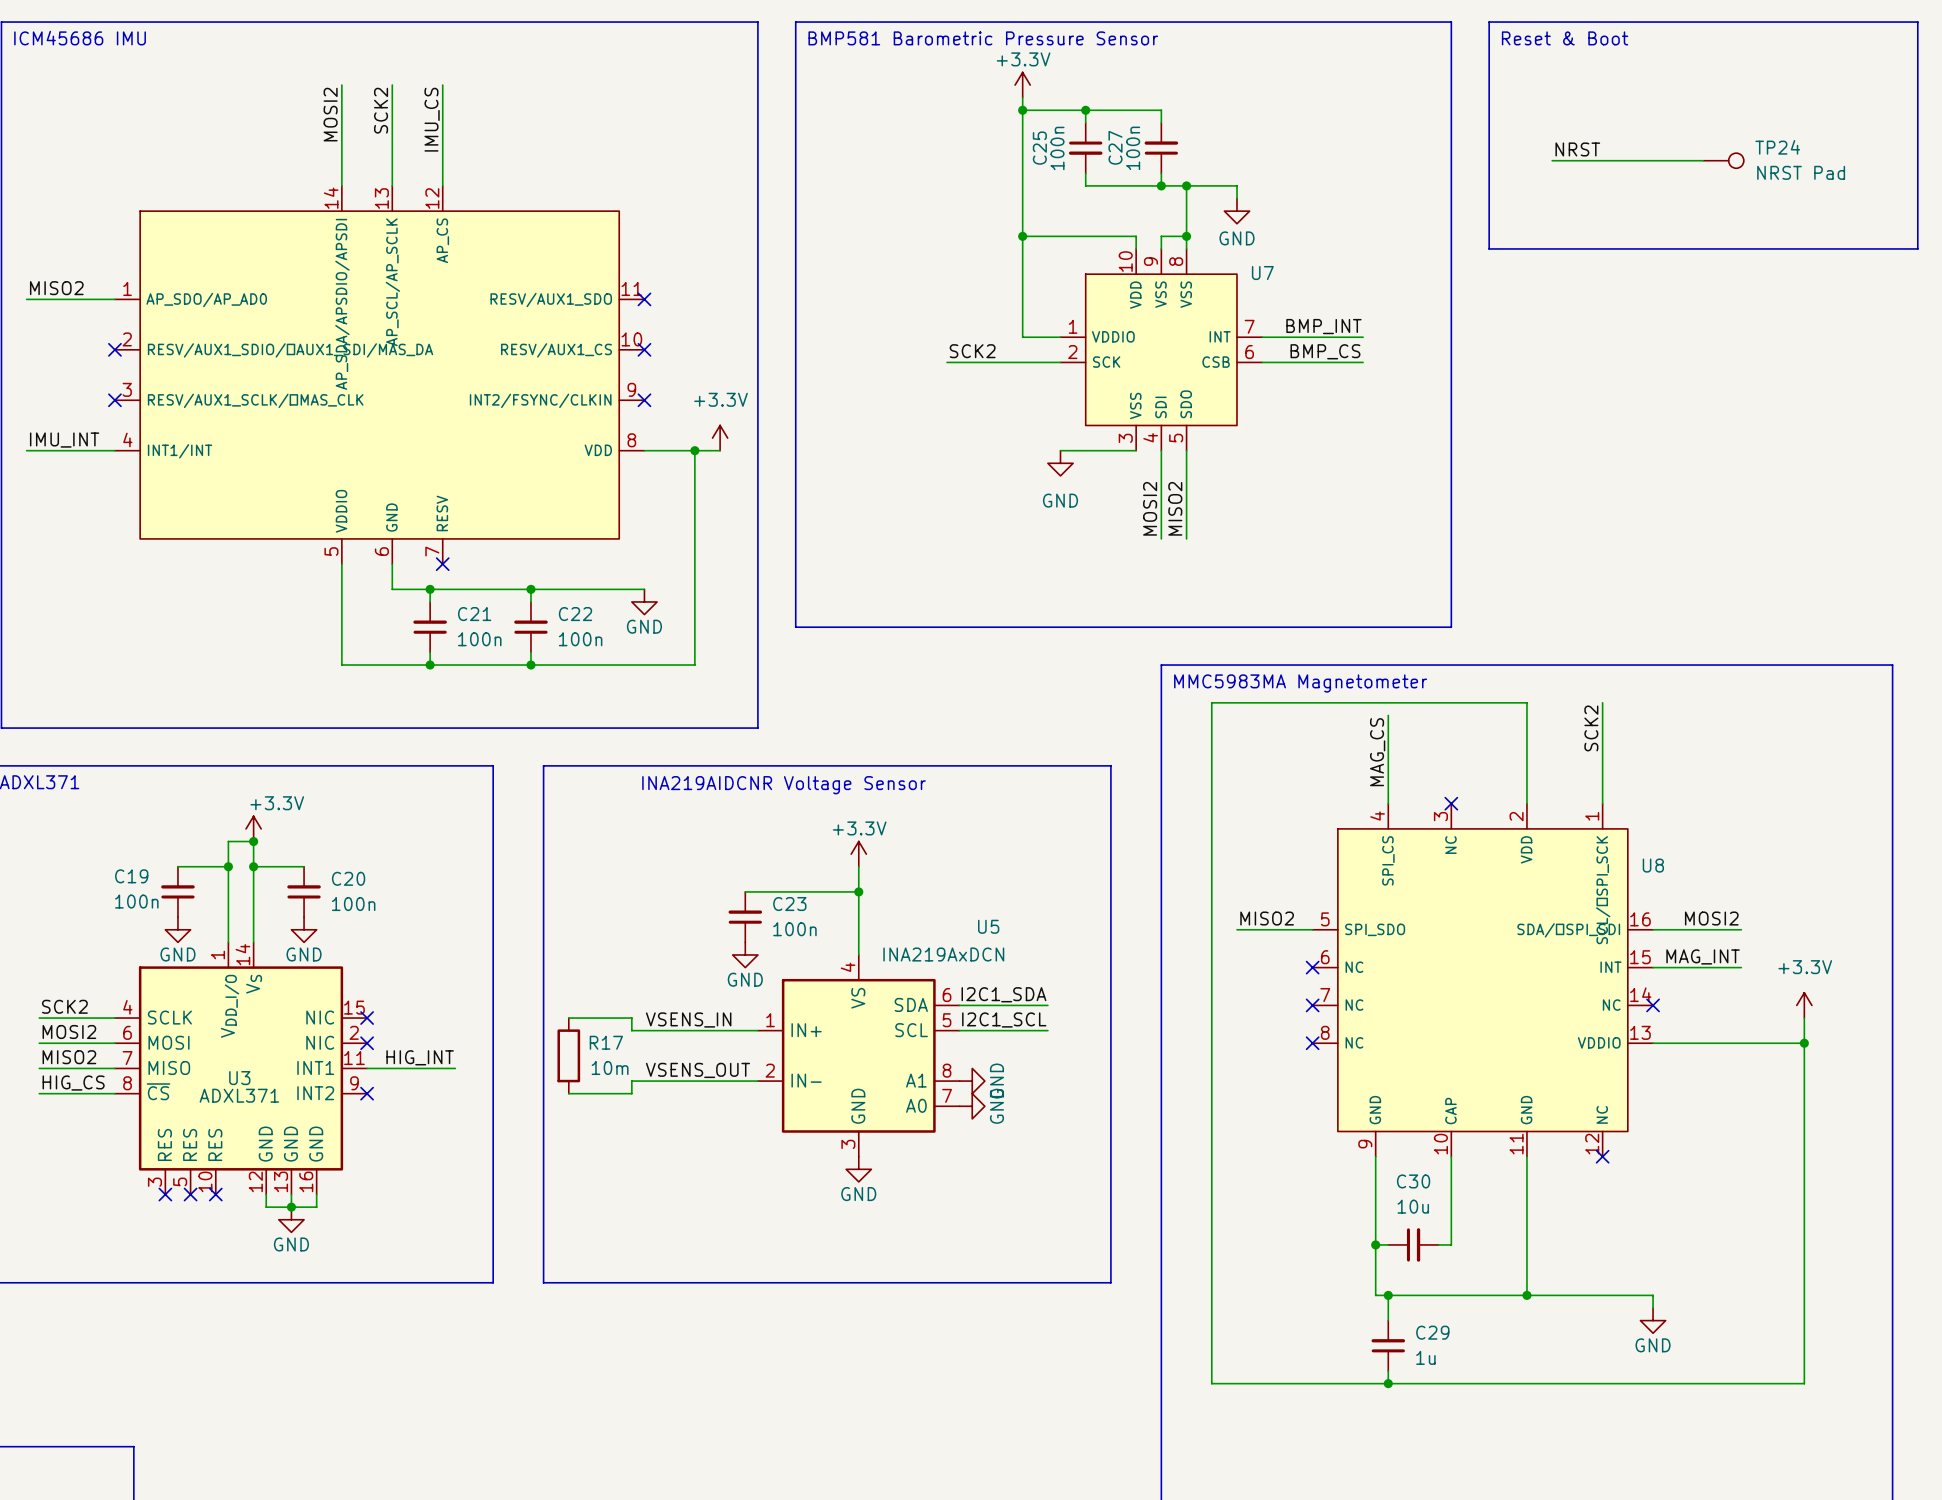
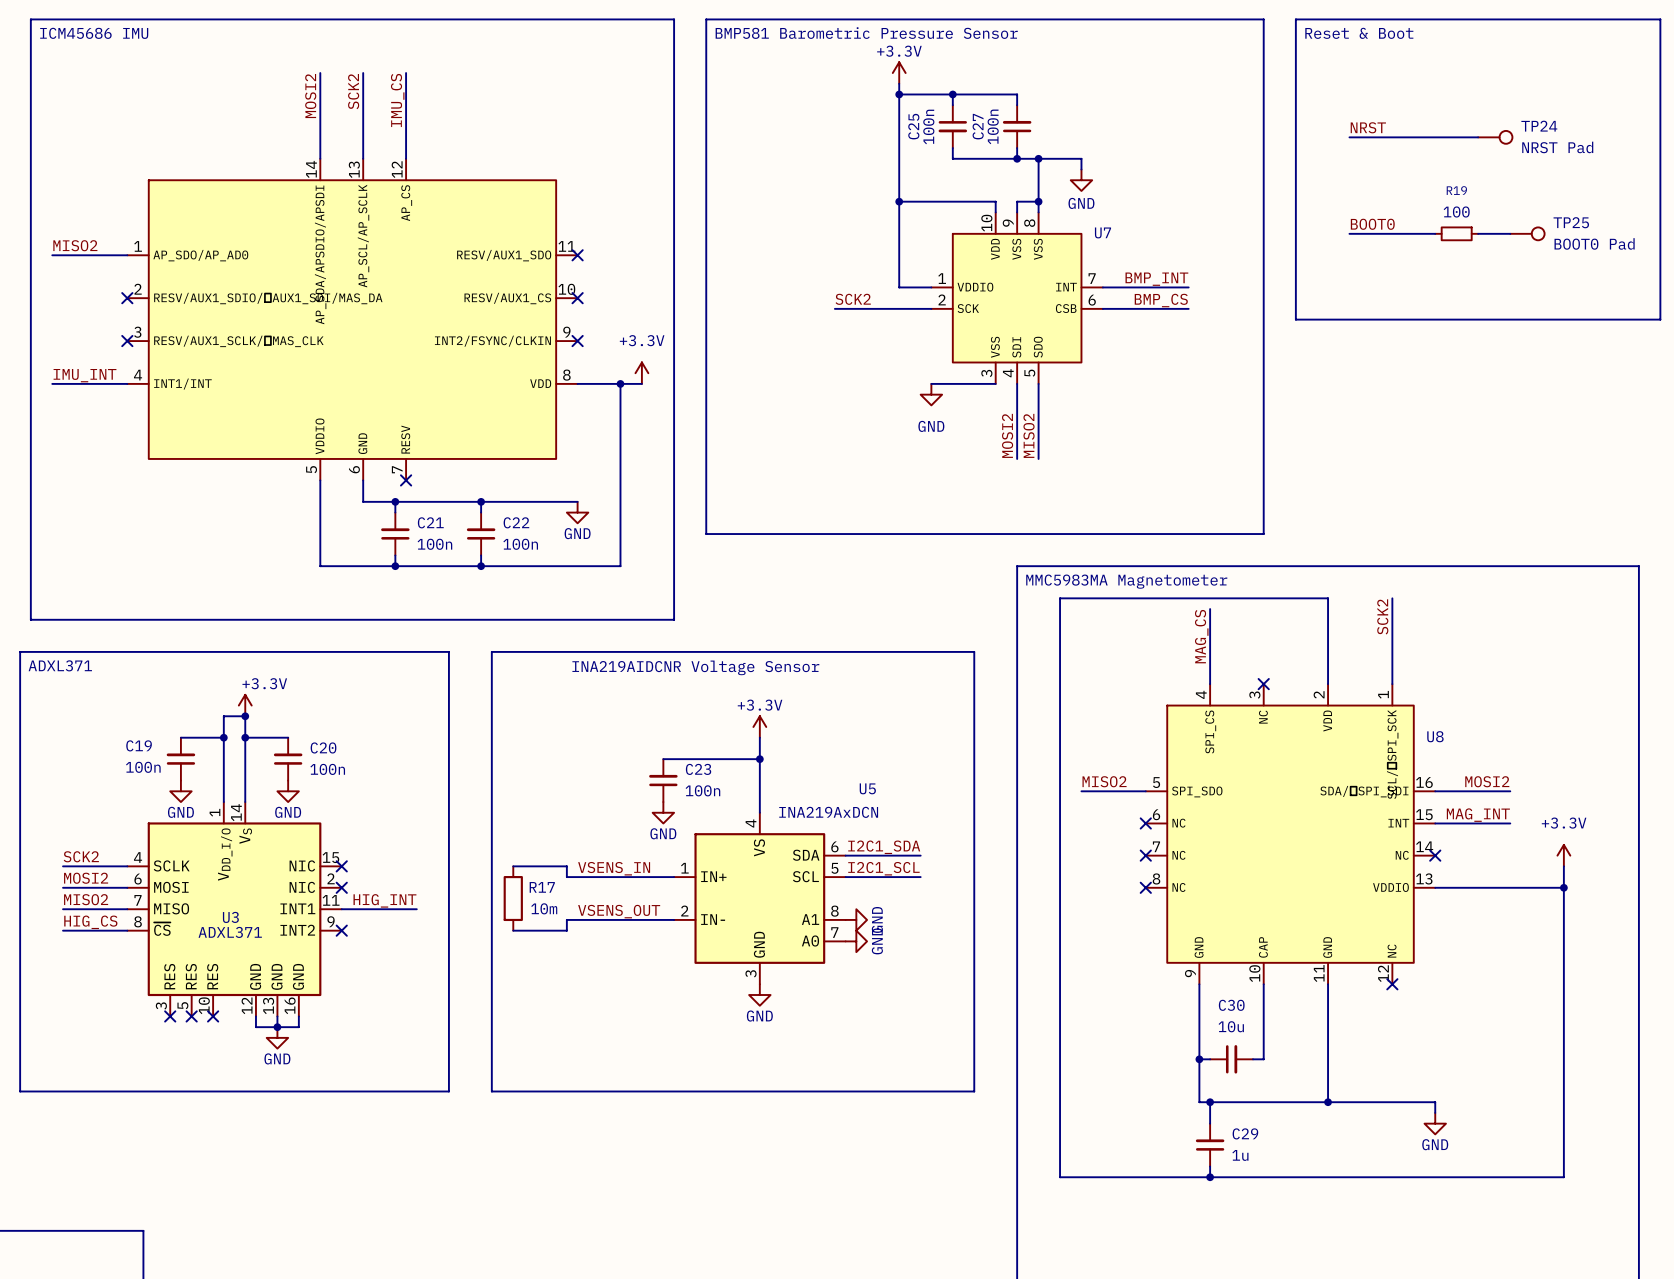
line: (1489, 248) (1917, 248) -> (1295, 212) (1295, 319) (1660, 319) (1660, 212)
label: none -> BOOT0 (1372, 224)
wire: none -> (1349, 233) (1435, 233)
R19: none -> 100 (1456, 233)
wire: none -> (1478, 233) (1510, 233)
TP25: none -> BOOT0 Pad (1527, 233)

